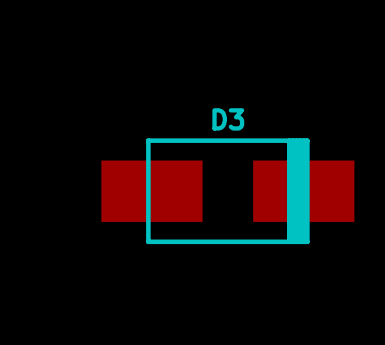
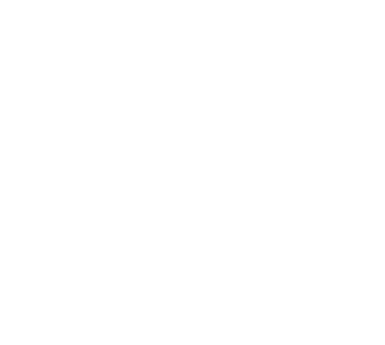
D3: (227, 191) -> none

